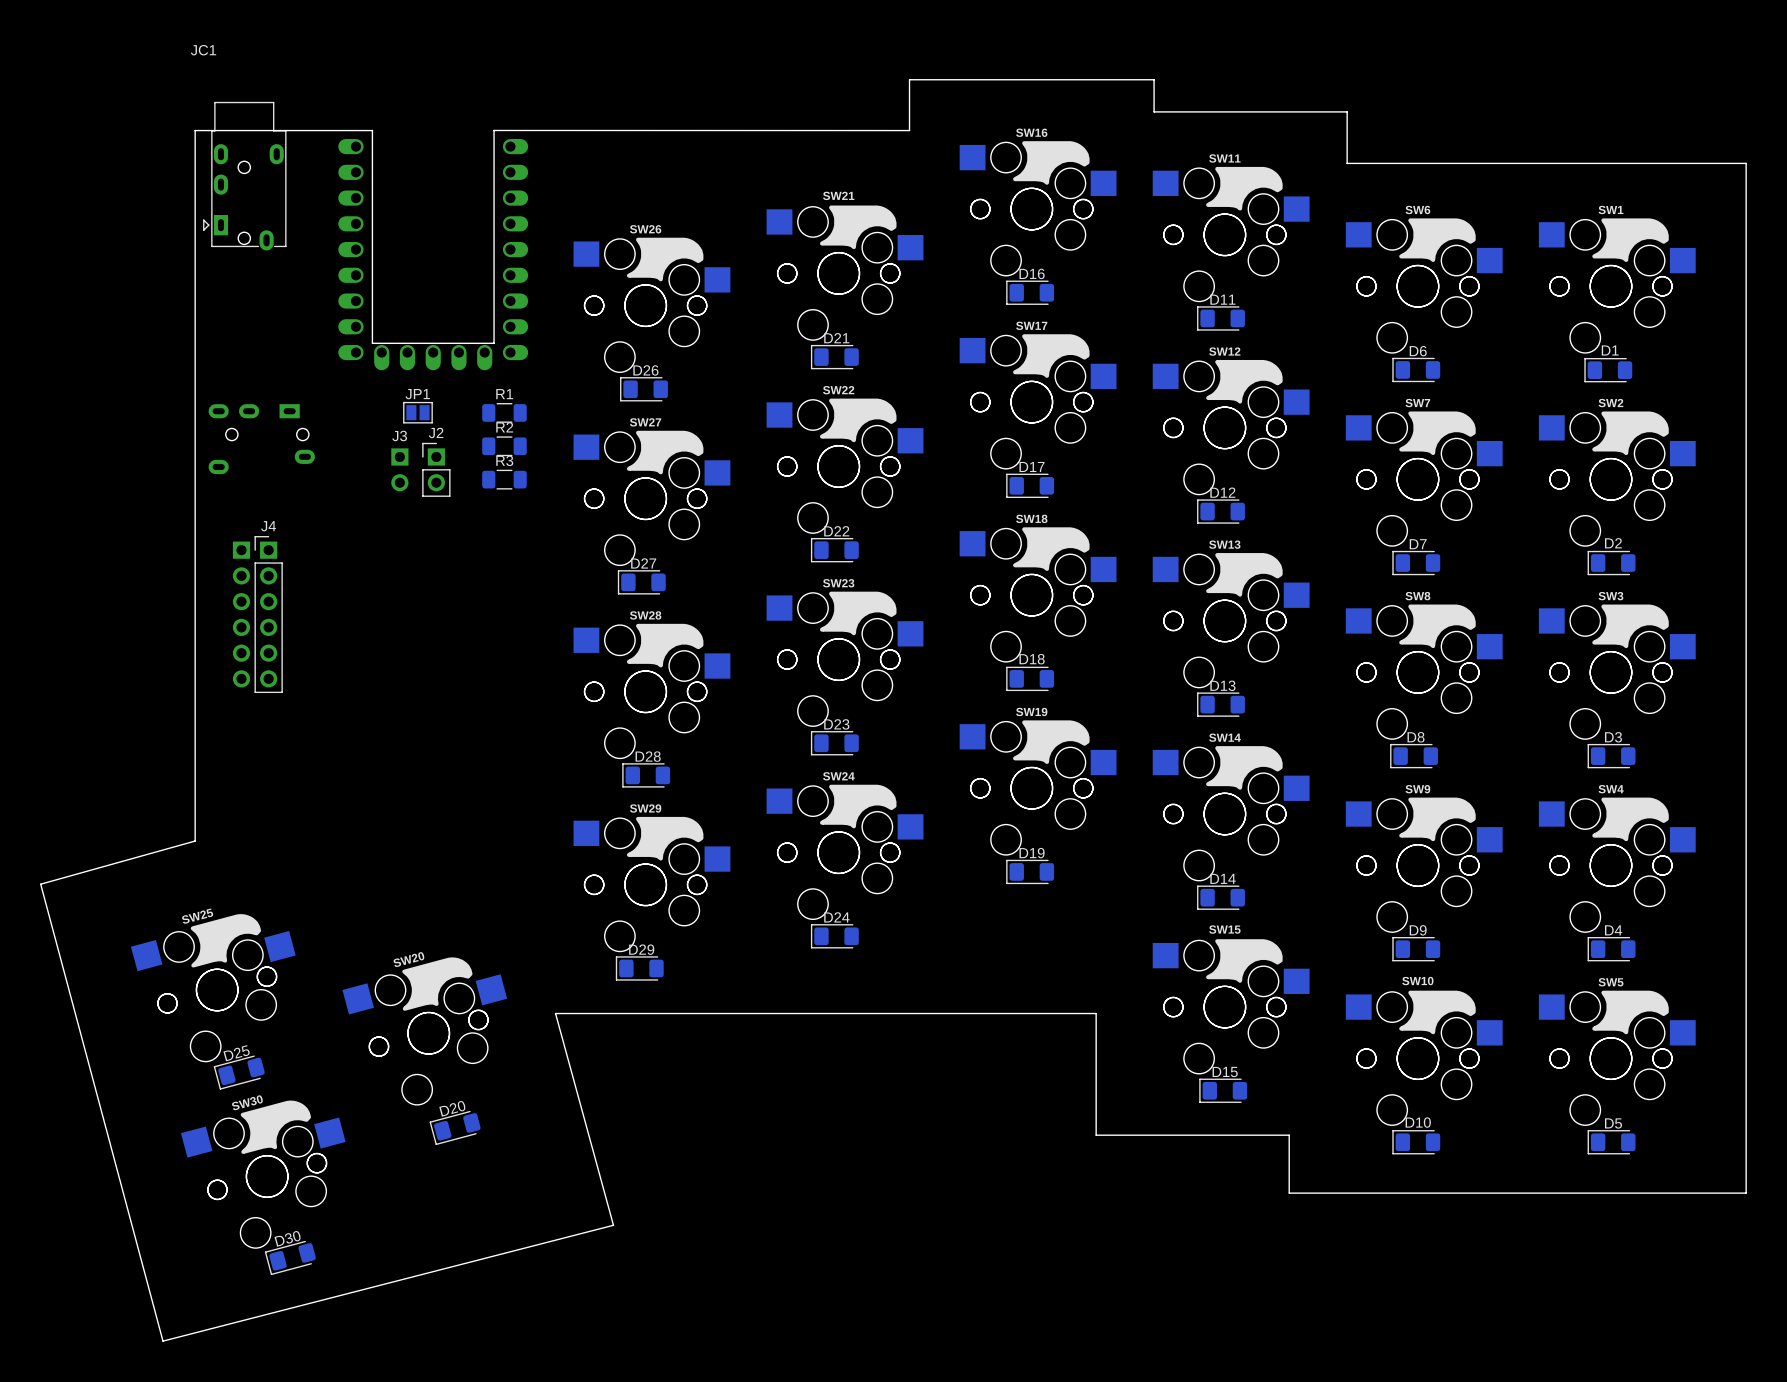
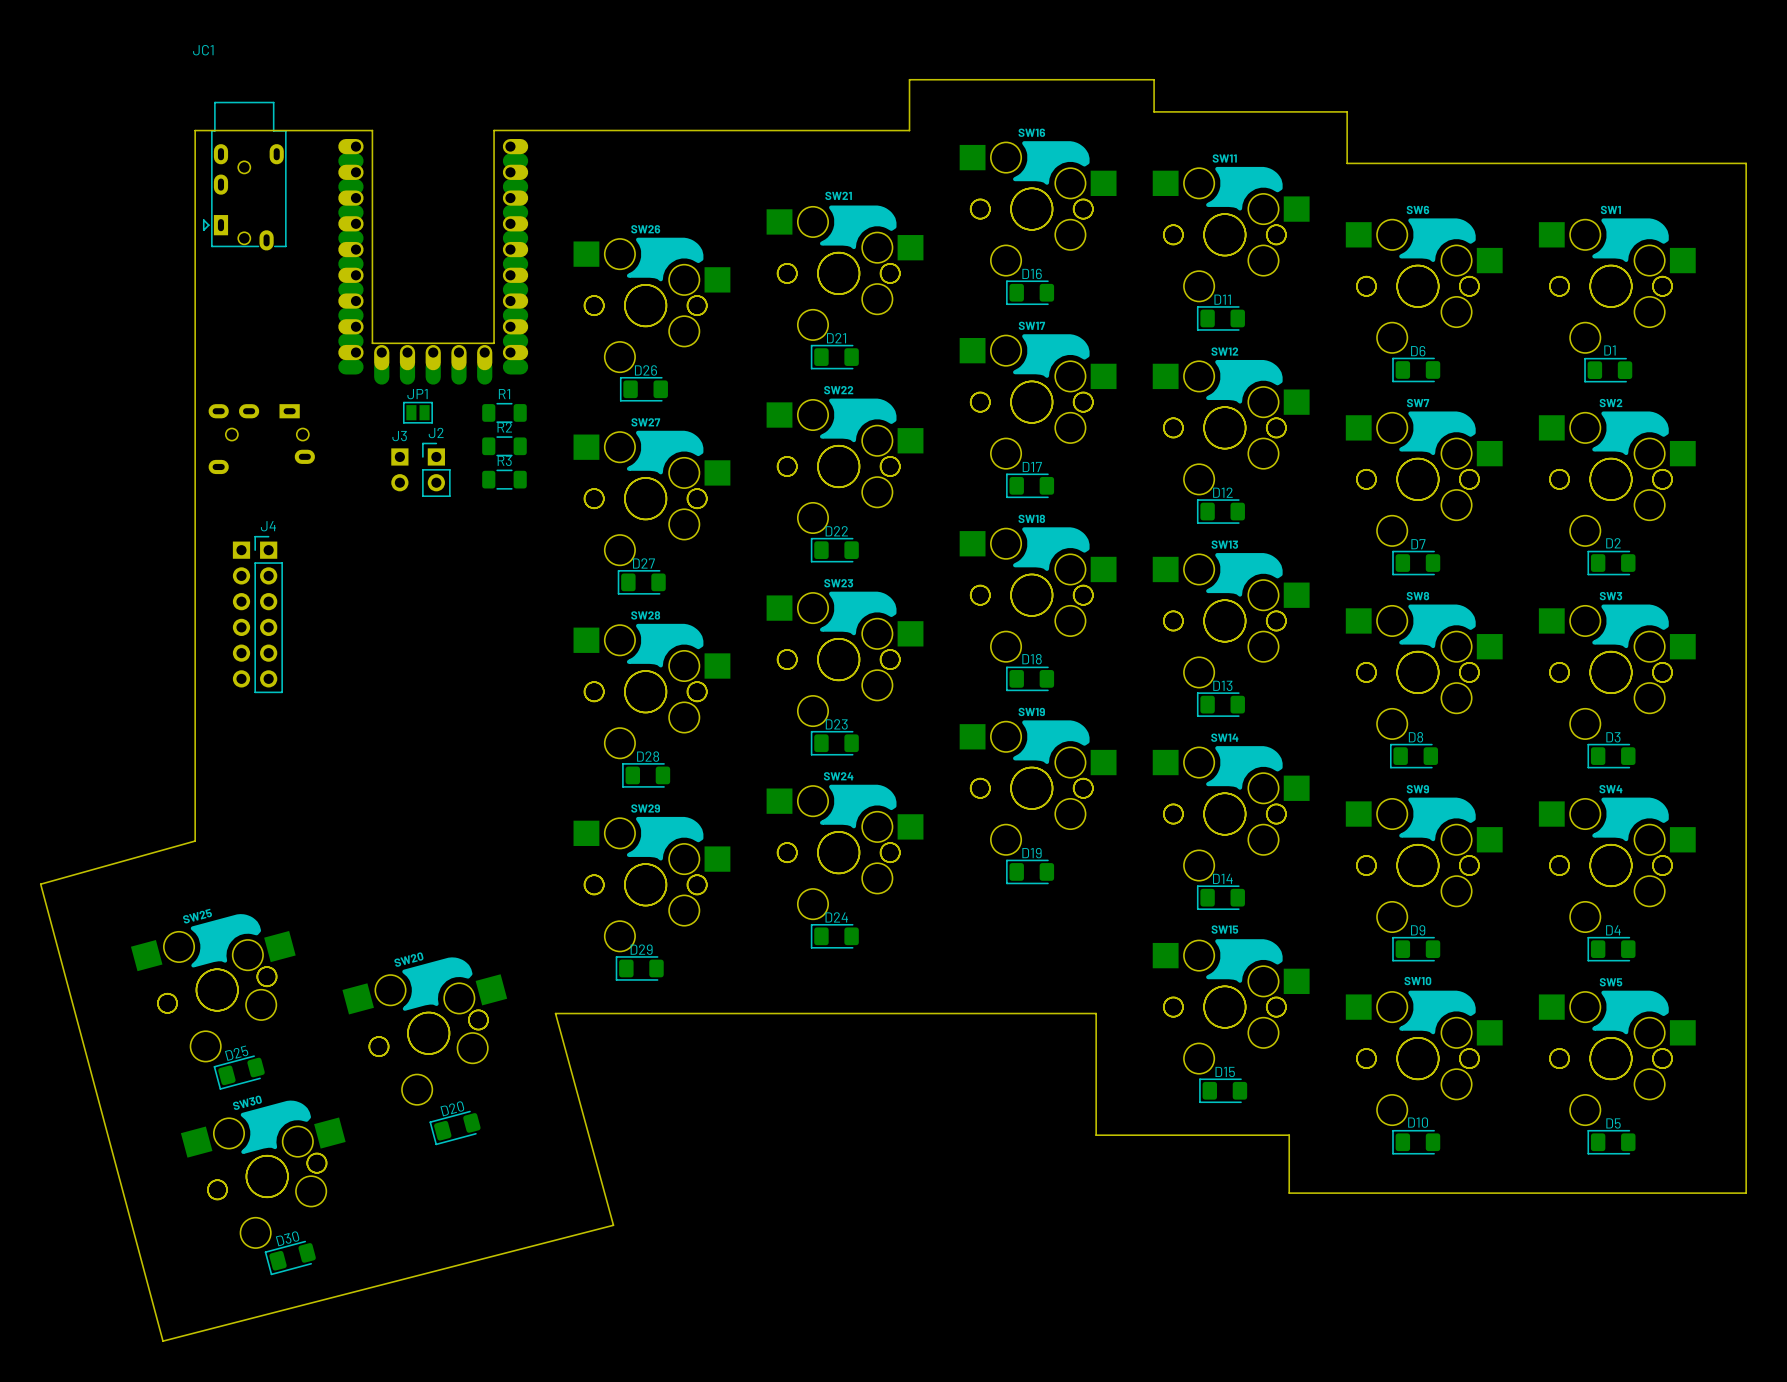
part: none -> (433, 269)

